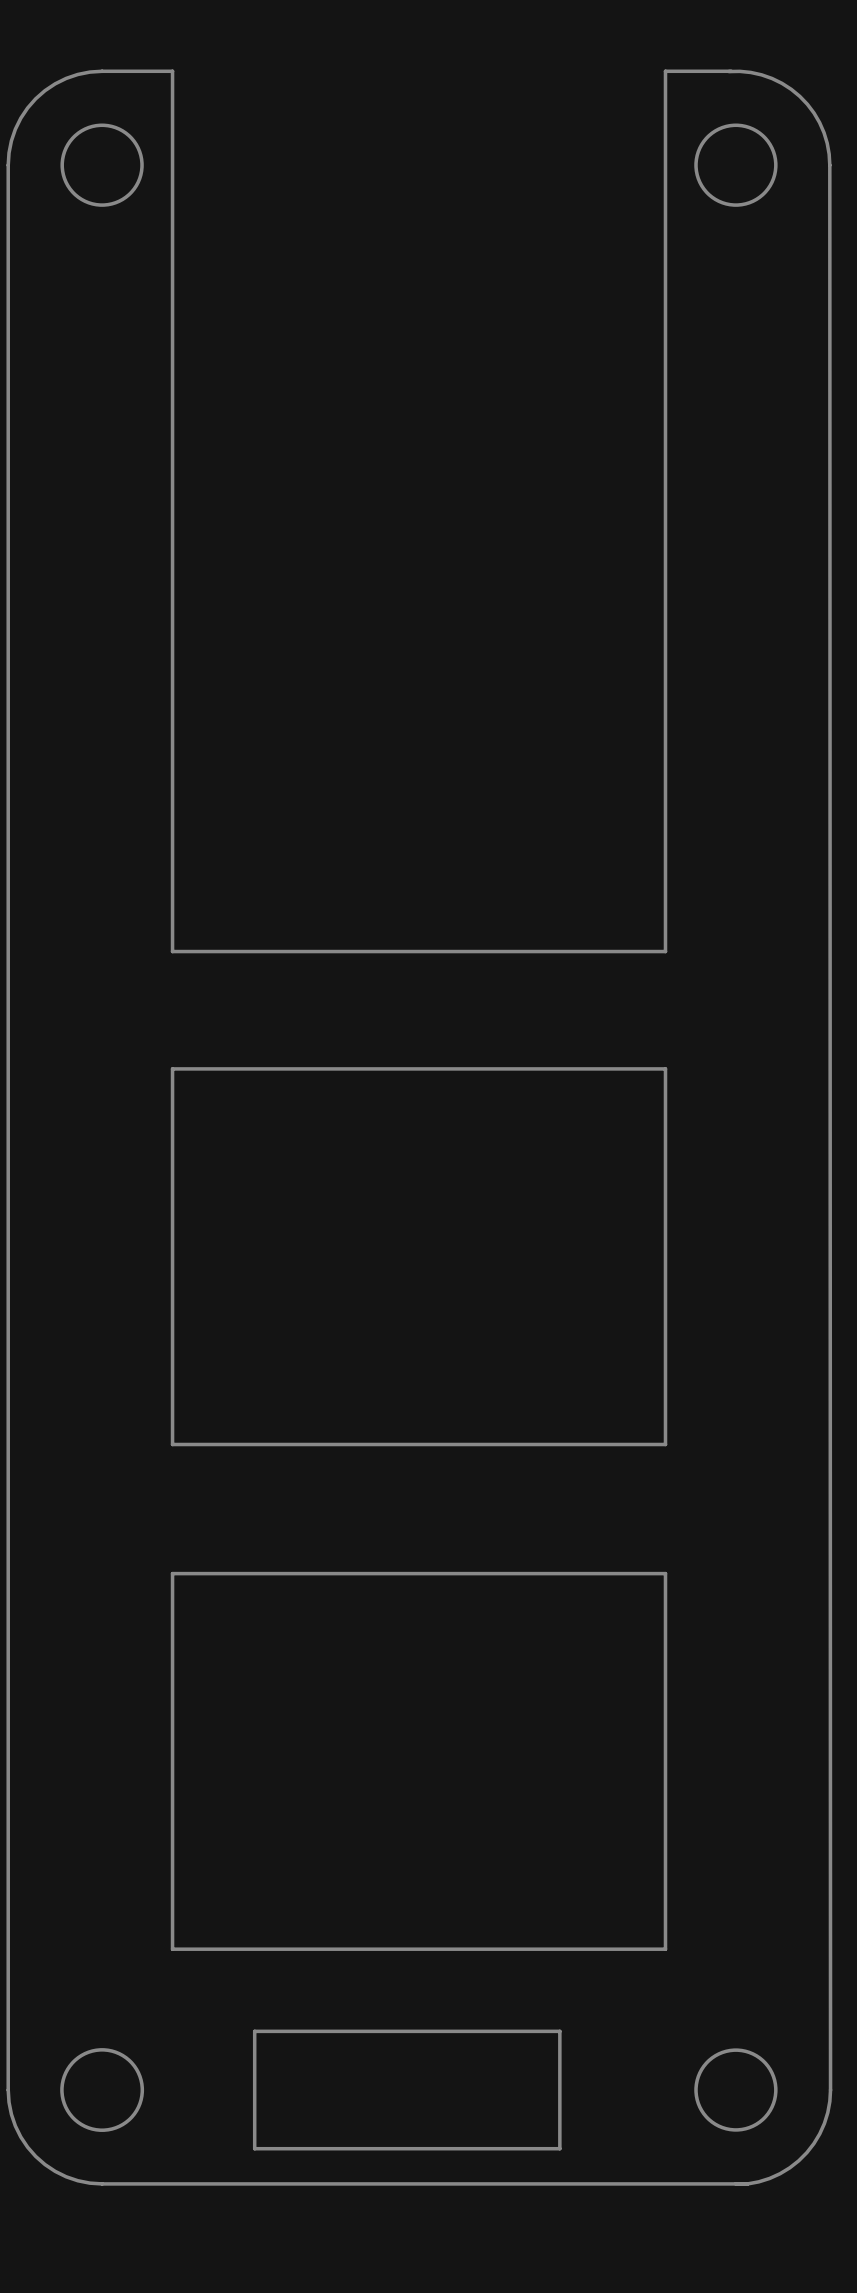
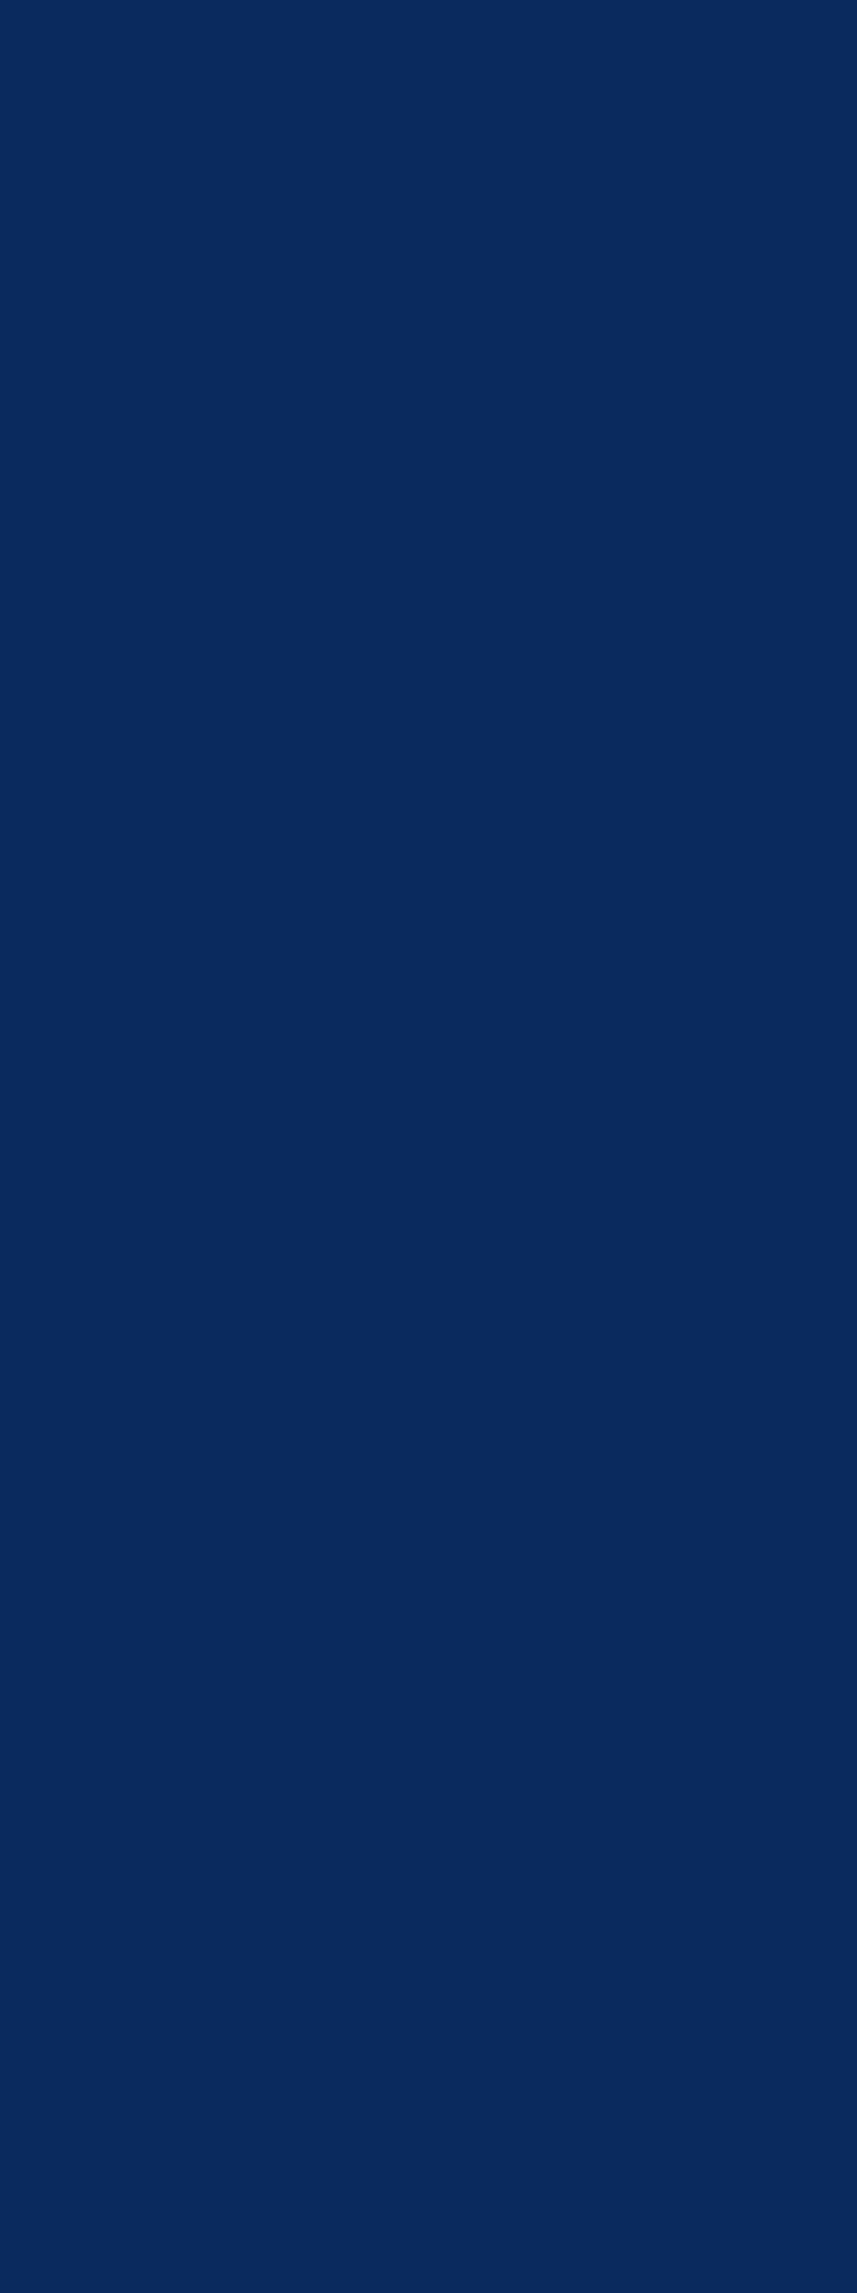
line: (731, 71) (665, 71) (665, 951) (172, 951) (172, 71) (89, 72) (66, 78) (44, 90) (27, 108) (20, 118) (11, 140) (8, 165) (8, 2090) (11, 2114) (15, 2125) (27, 2147) (44, 2164) (55, 2171) (77, 2180) (102, 2183) (747, 2183) (780, 2173) (798, 2160) (819, 2133) (827, 2112) (830, 2090) (829, 165) (824, 132) (814, 113) (799, 96) (781, 83) (761, 74) (728, 71) -> none
drawing: [60, 123, 144, 207] -> none
drawing: [694, 123, 778, 207] -> none
line: (172, 1068) (172, 1444) (665, 1444) (665, 1068) (172, 1068) -> none
line: (172, 1573) (172, 1949) (665, 1949) (665, 1573) (172, 1573) -> none
line: (254, 2031) (254, 2148) (559, 2148) (559, 2031) (254, 2031) -> none
drawing: [60, 2048, 145, 2132] -> none
drawing: [694, 2048, 778, 2132] -> none

